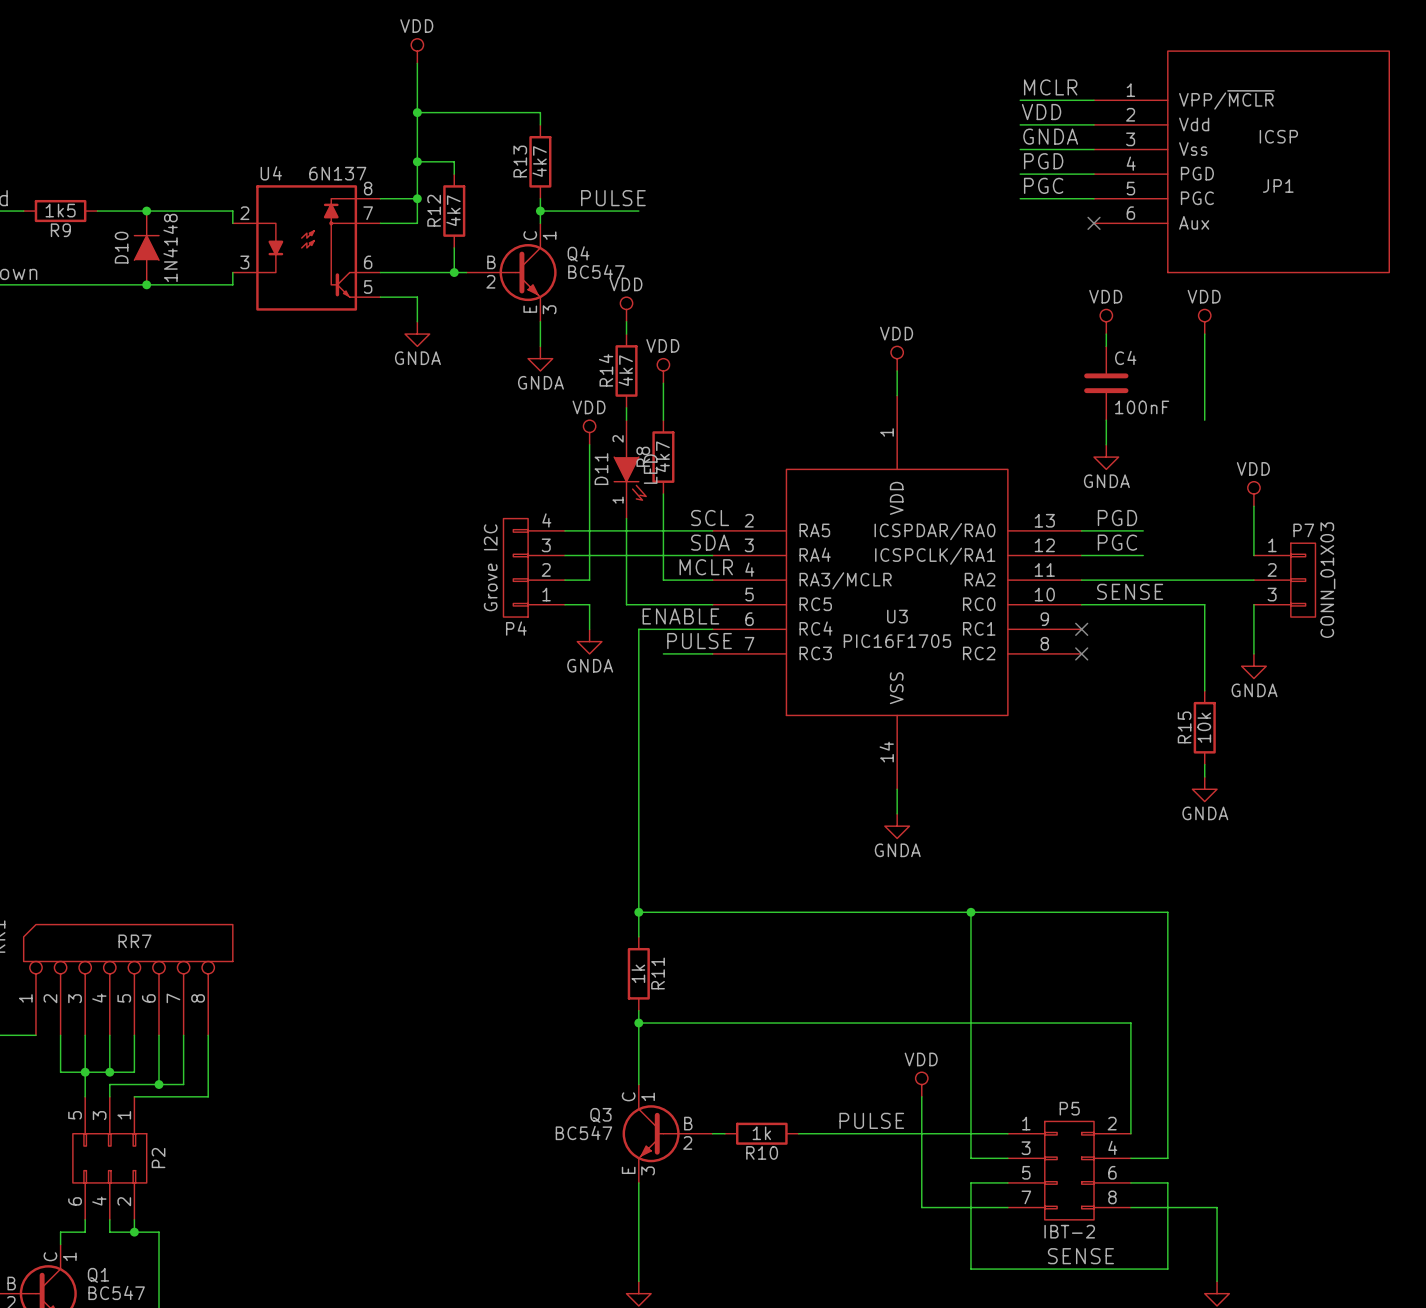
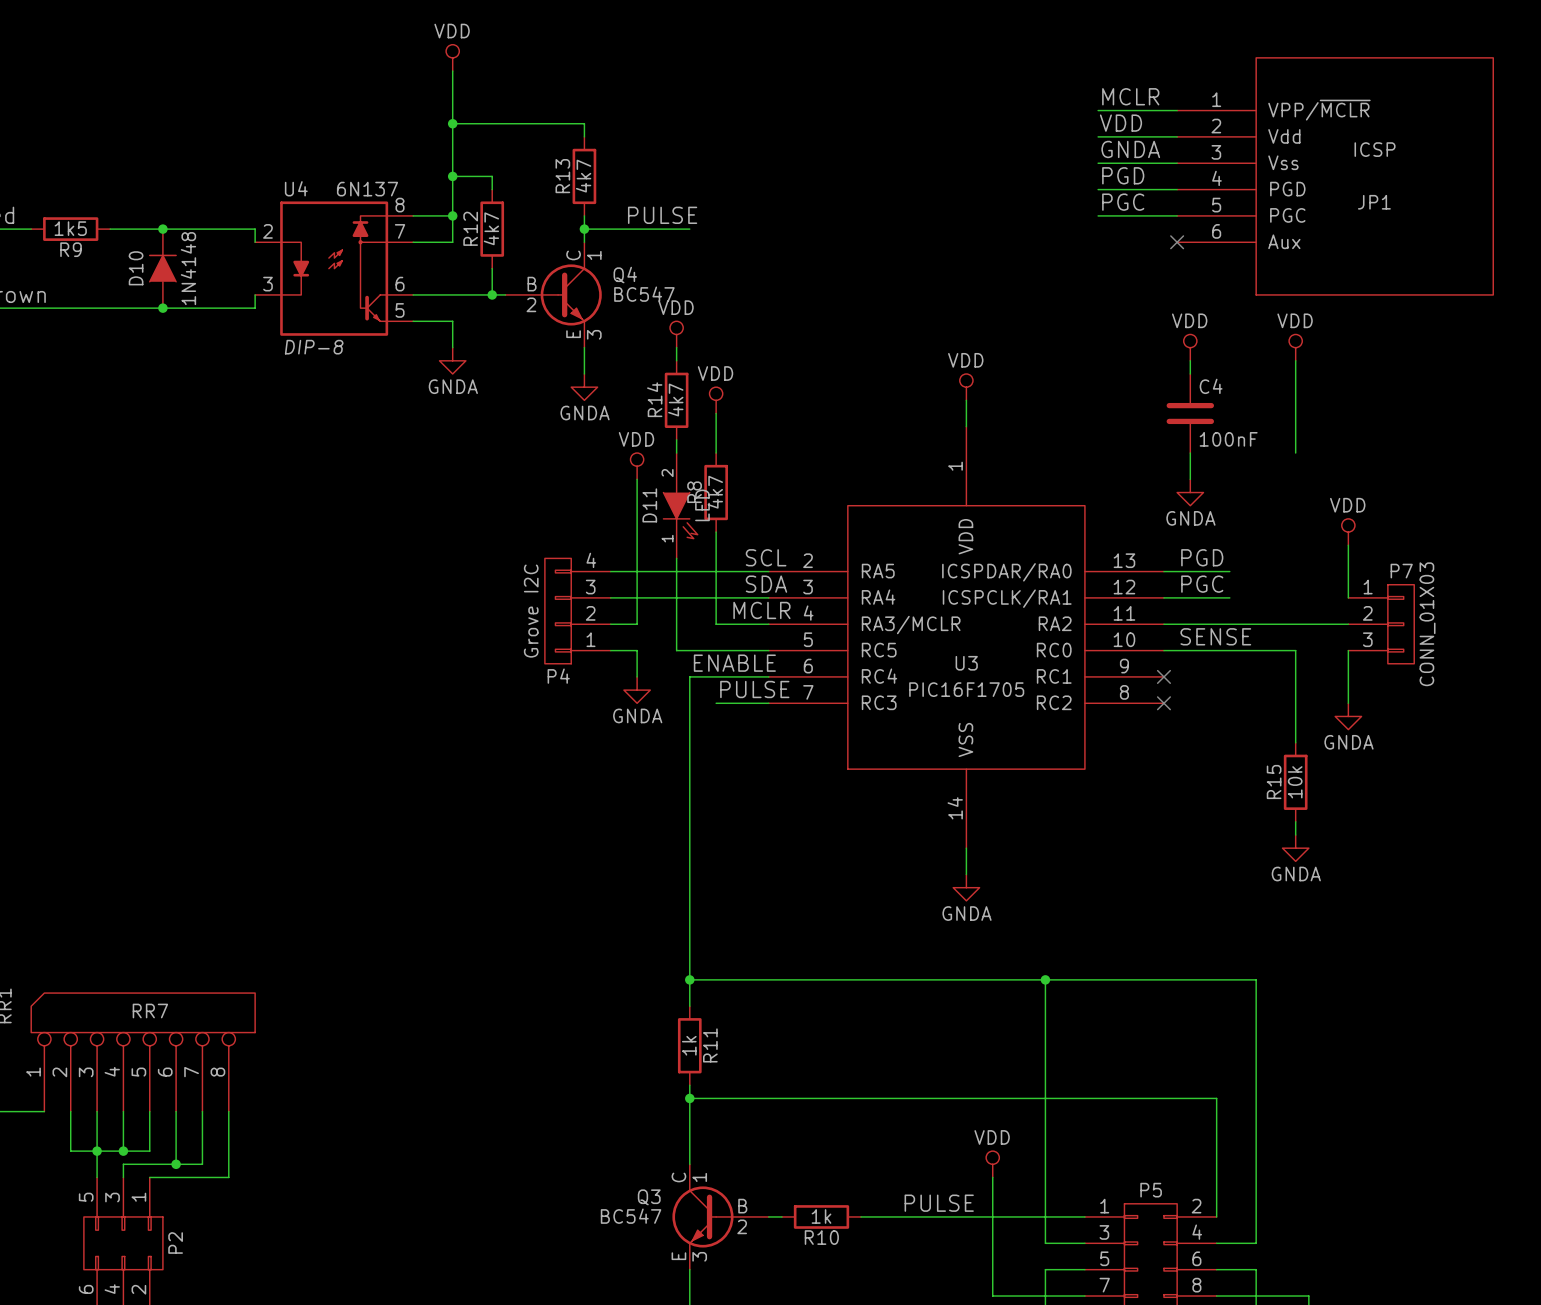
U4 text: none -> DIP-8 (314, 347)

